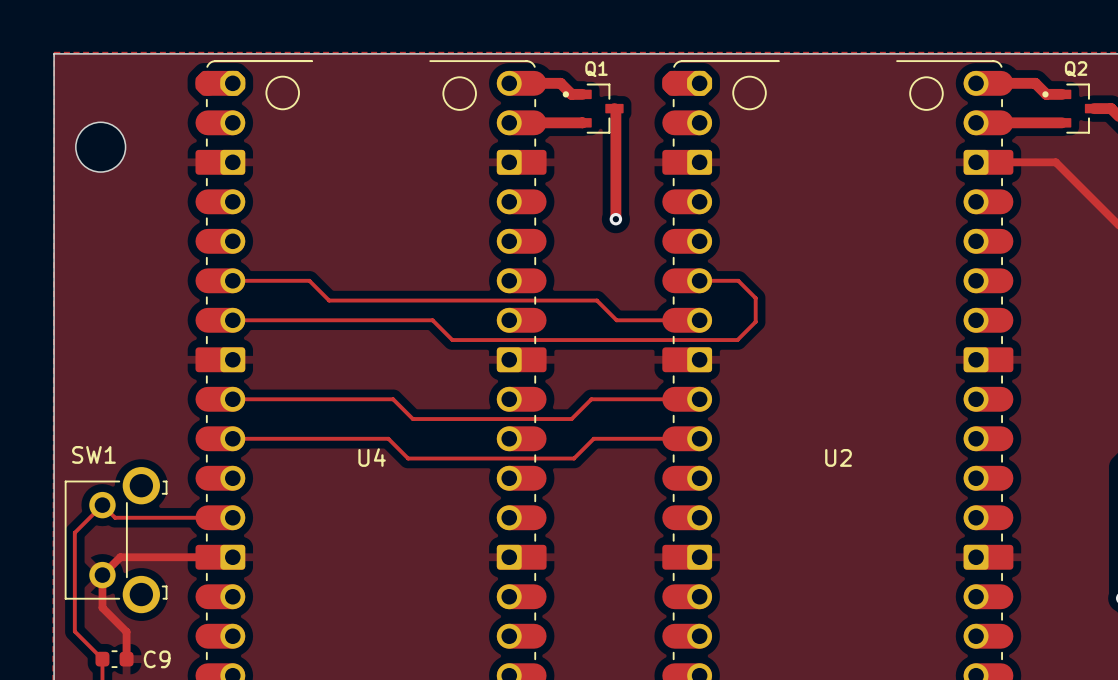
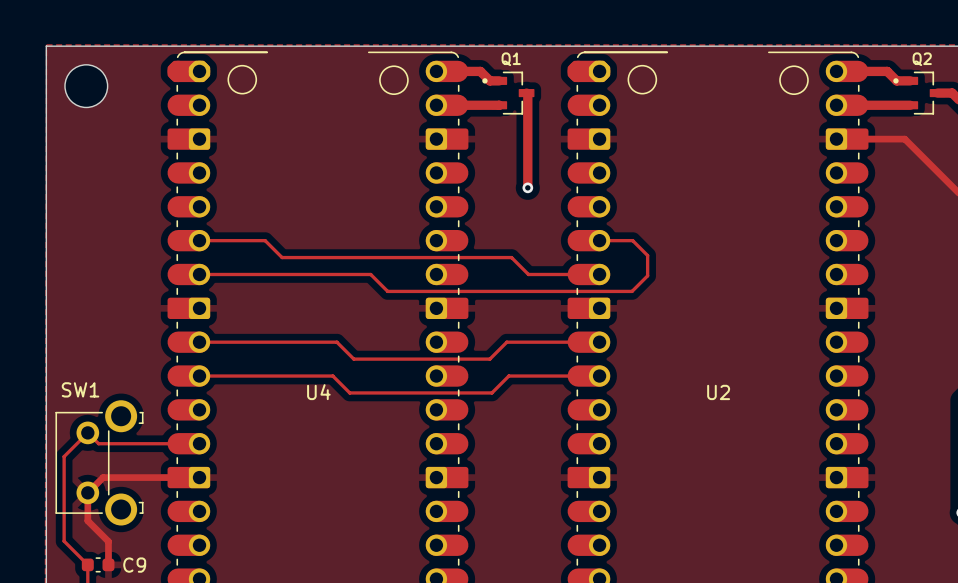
round board edge position: (100, 147) -> (86, 86)

